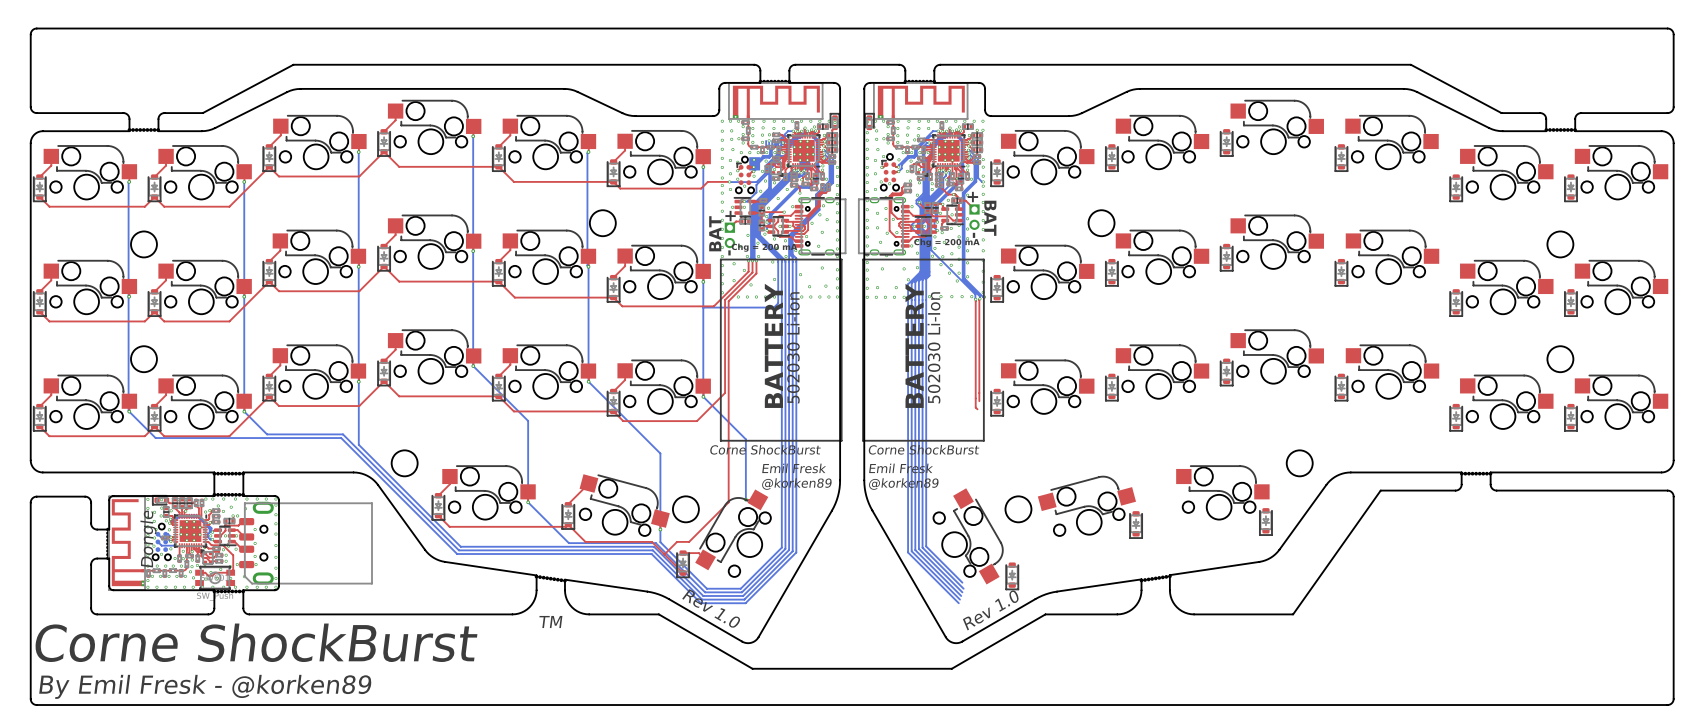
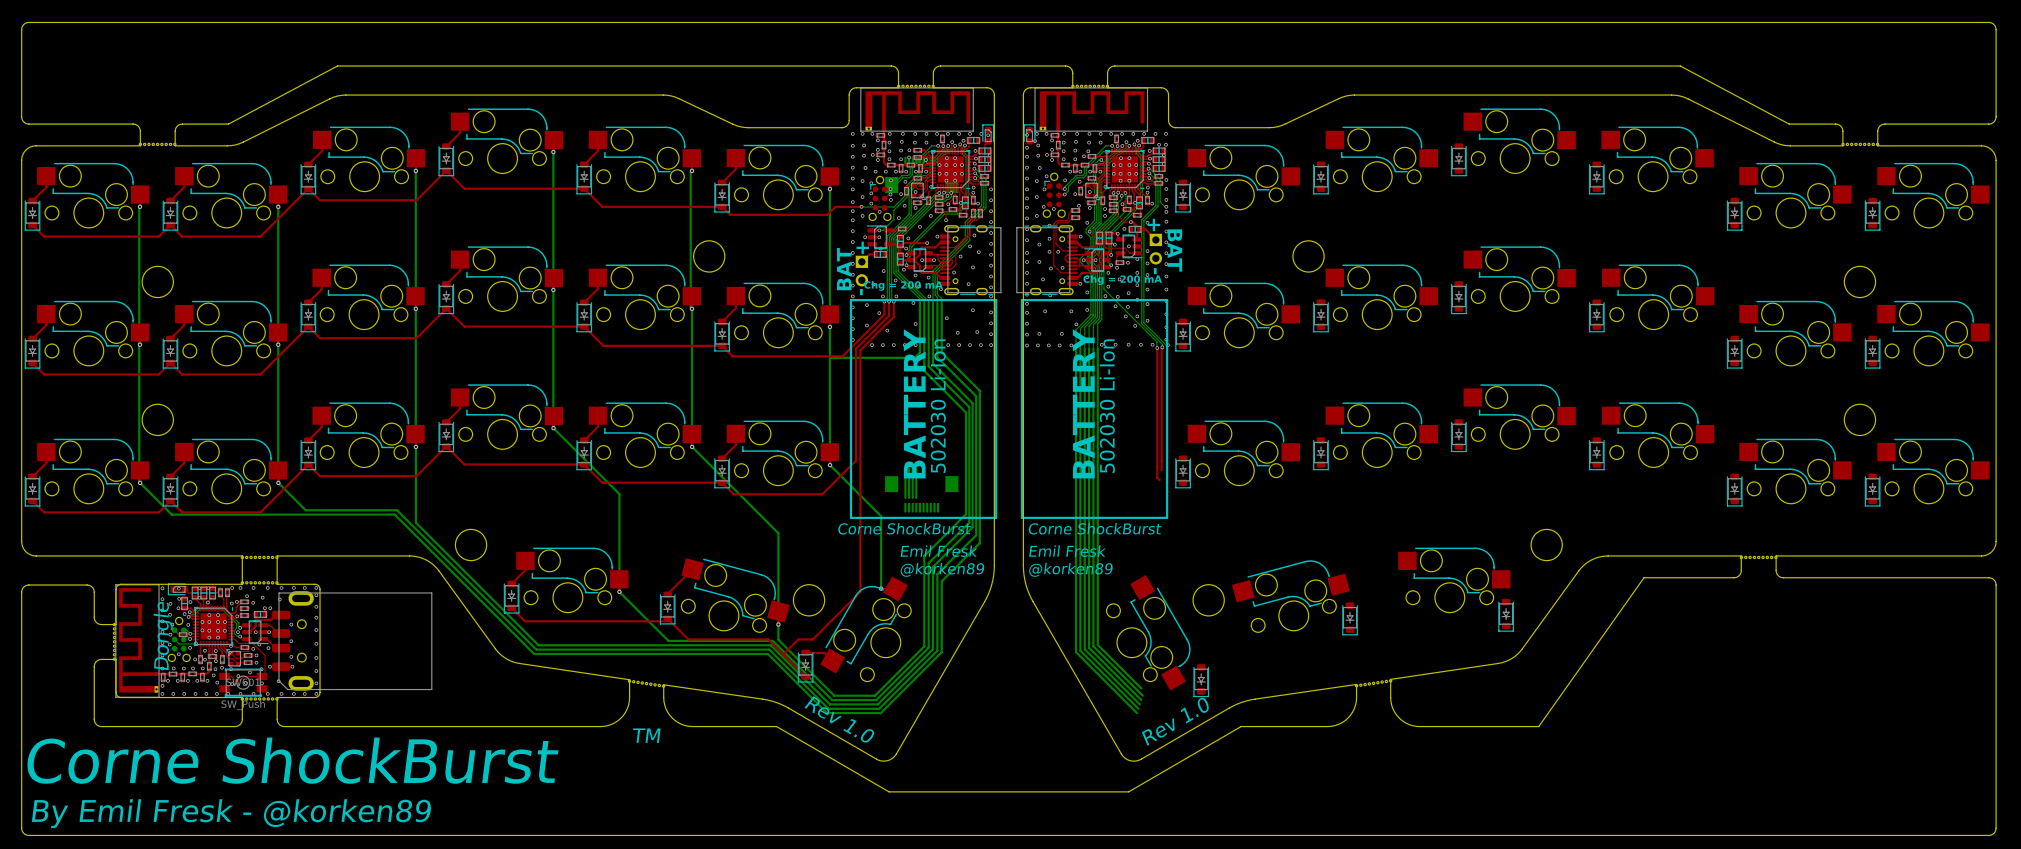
bottom track: (796, 303) (796, 493) -> (941, 352) (979, 390) (979, 543) (941, 581)
bottom track: (792, 307) (792, 487) -> (937, 357) (976, 396) (976, 535) (937, 574)
bottom track: (789, 312) (789, 481) -> (933, 363) (972, 403) (972, 527) (933, 566)
bottom track: (785, 314) (785, 478) -> (928, 366) (969, 407) (969, 522) (928, 563)
bottom track: (781, 318) (781, 472) -> (924, 370) (966, 412) (966, 514) (924, 555)
bottom track: none -> (905, 468) (905, 497)
bottom track: none -> (909, 468) (909, 497)
bottom track: none -> (912, 468) (912, 497)
bottom track: none -> (916, 468) (916, 497)
part: none -> (921, 494)

